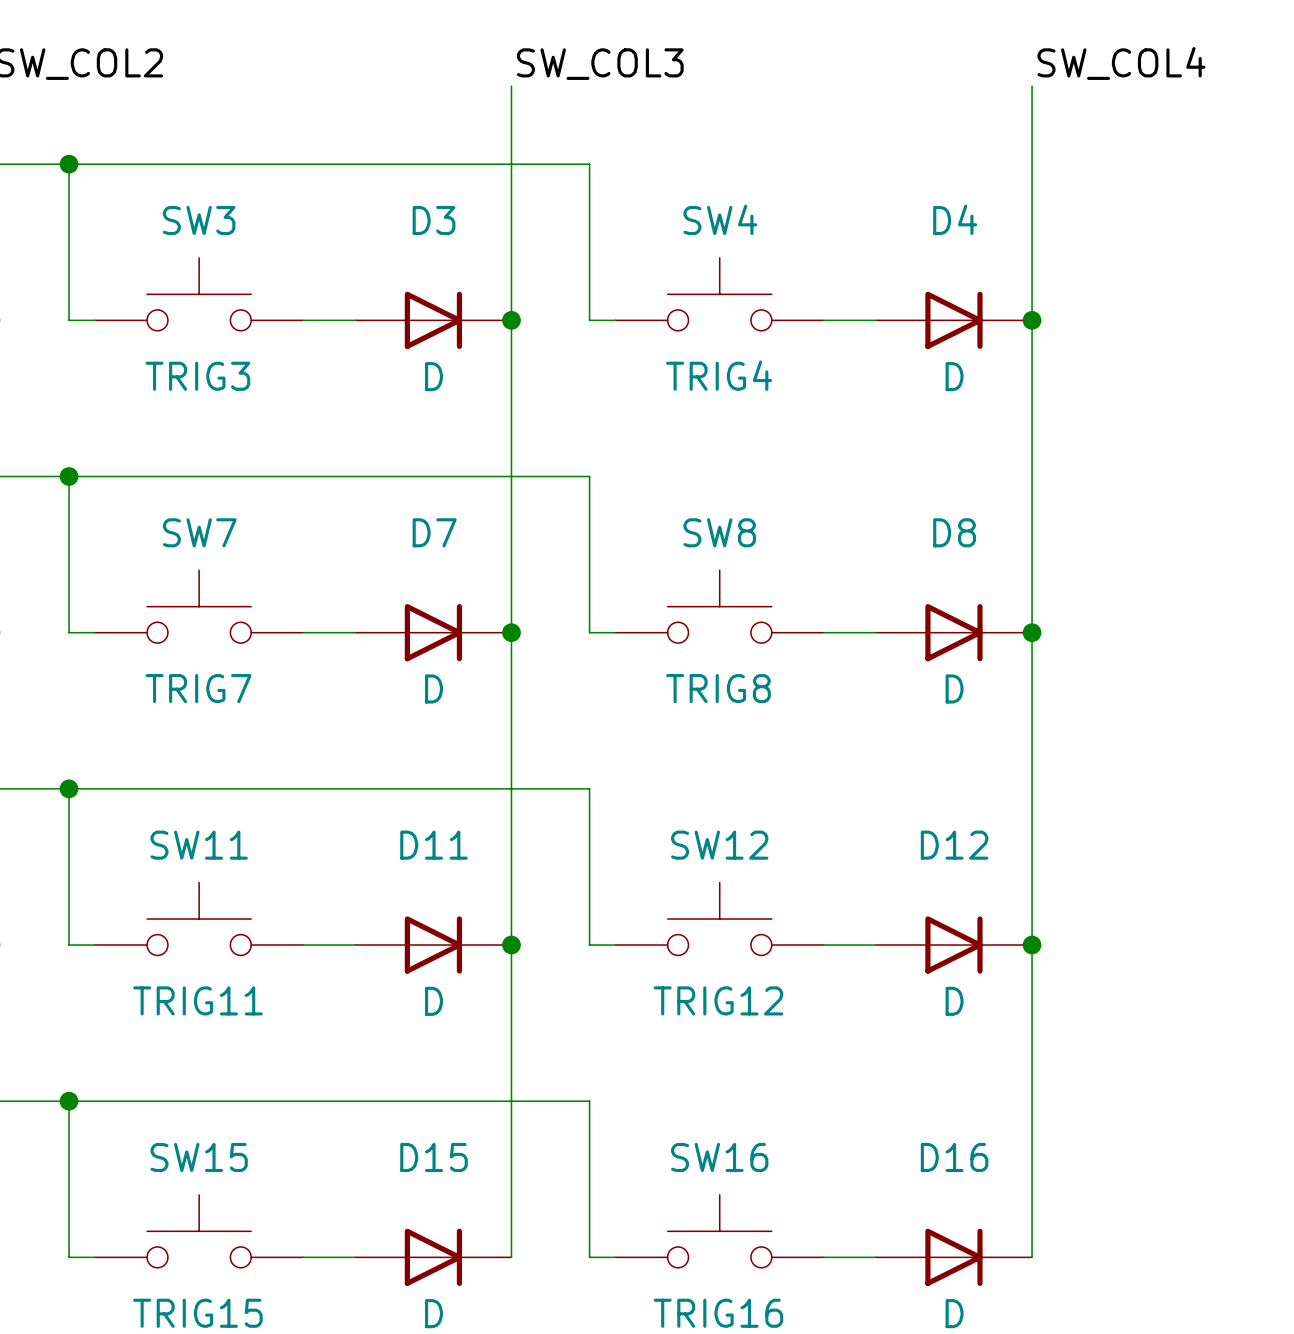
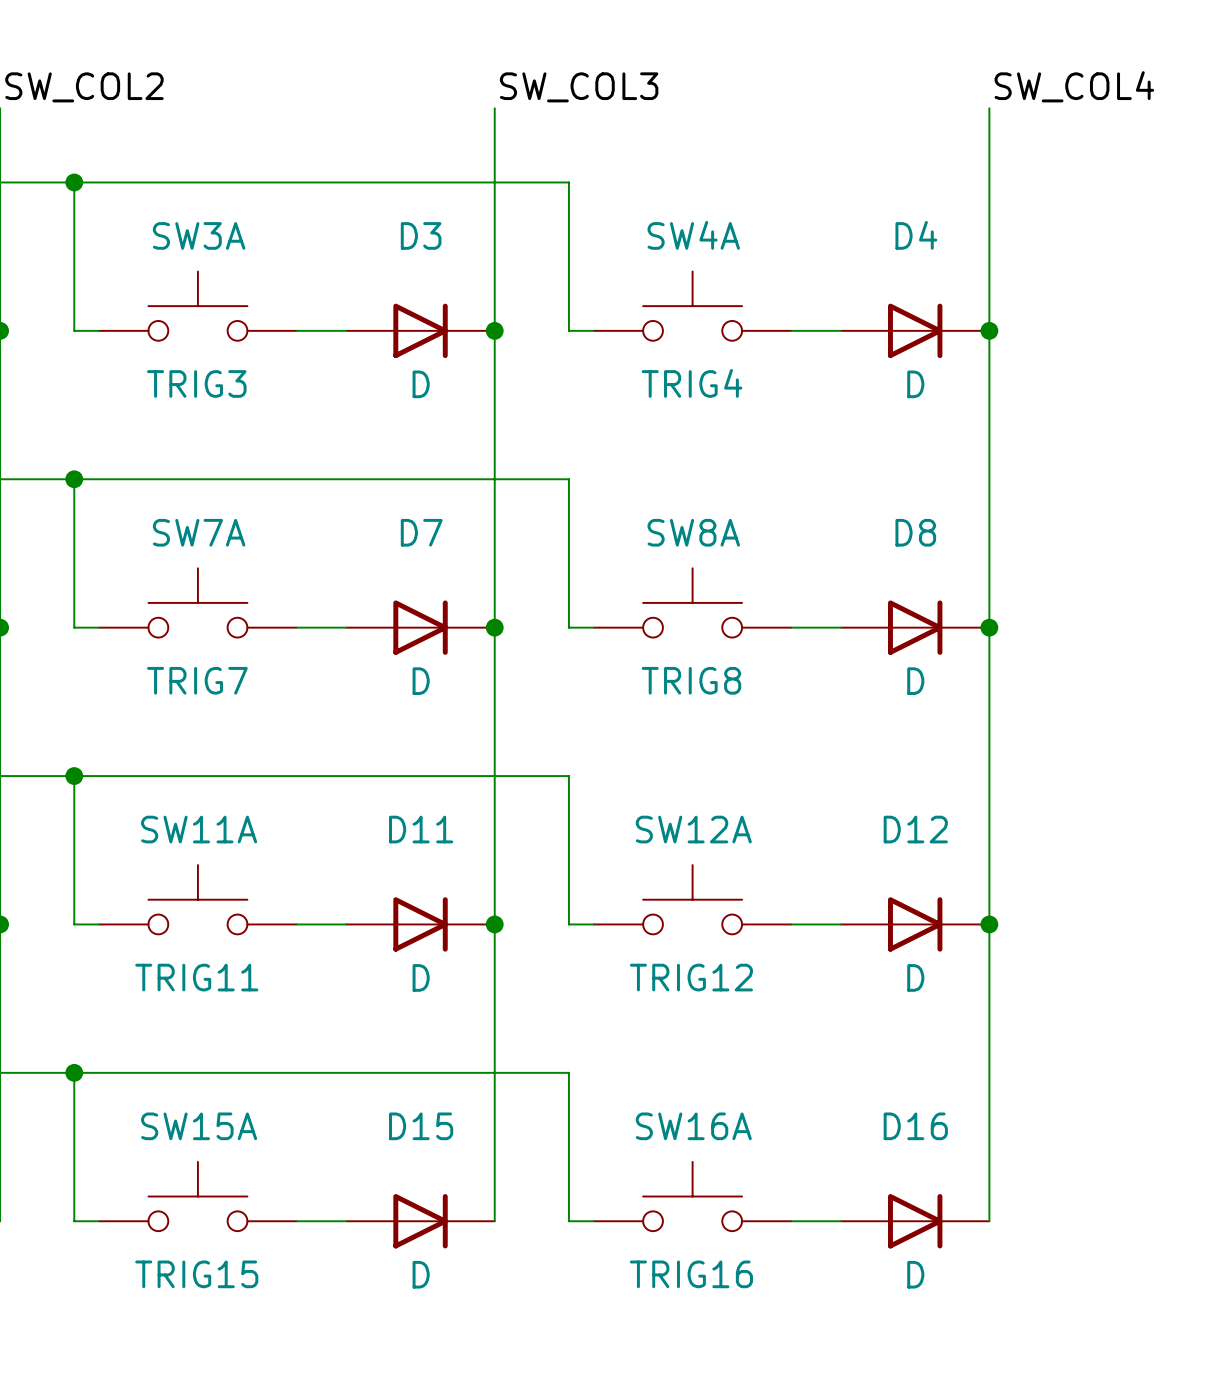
SW4 name: SW4 (720, 219) -> SW4A (693, 235)
SW3 name: SW3 (199, 220) -> SW3A (199, 235)
SW7 name: SW7 (199, 532) -> SW7A (199, 532)
SW8 name: SW8 (719, 532) -> SW8A (693, 532)
SW11 name: SW11 (199, 845) -> SW11A (199, 829)
SW12 name: SW12 (719, 845) -> SW12A (693, 829)
SW15 name: SW15 (199, 1157) -> SW15A (199, 1126)
SW16 name: SW16 (719, 1157) -> SW16A (693, 1126)

